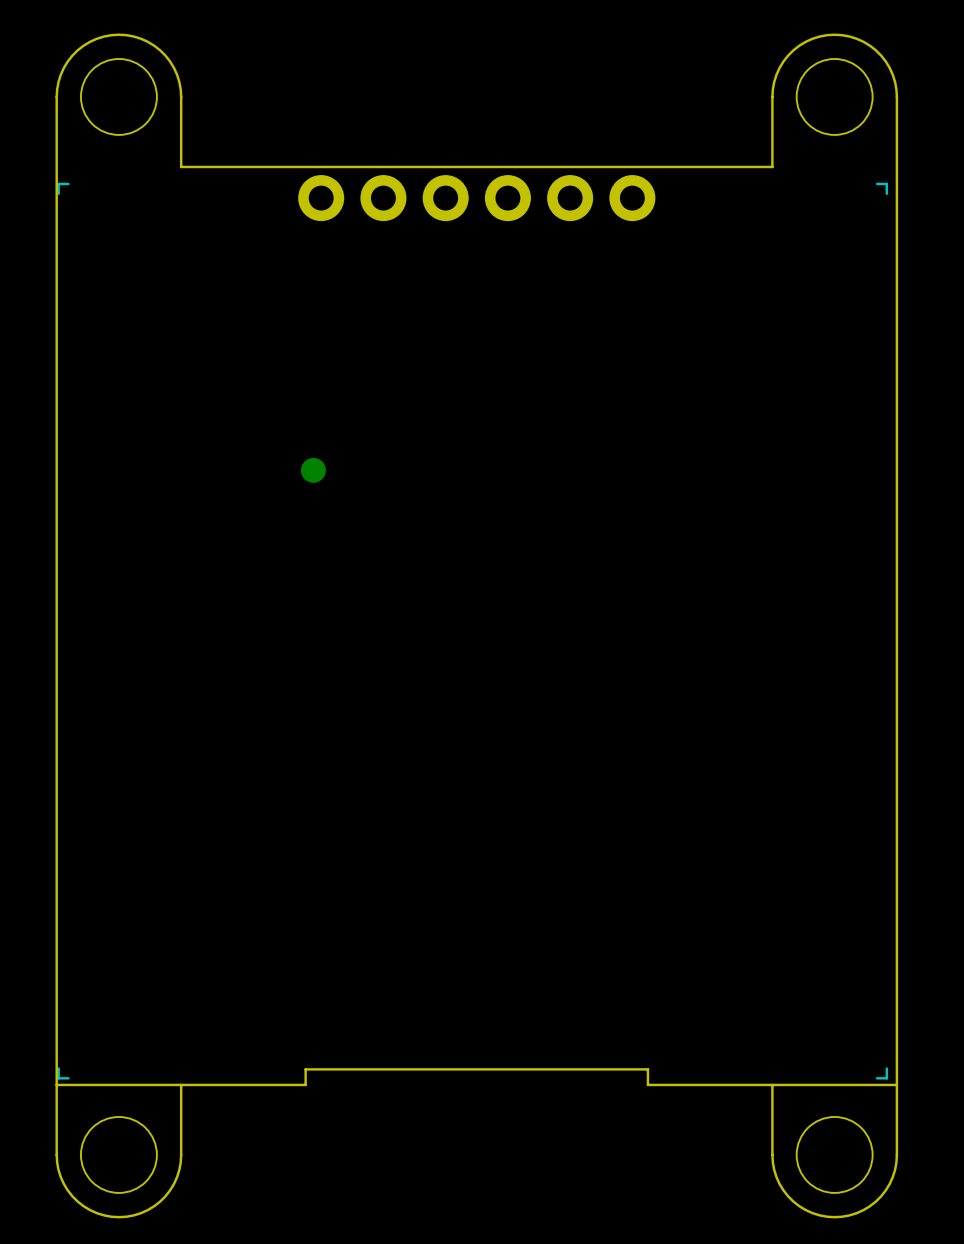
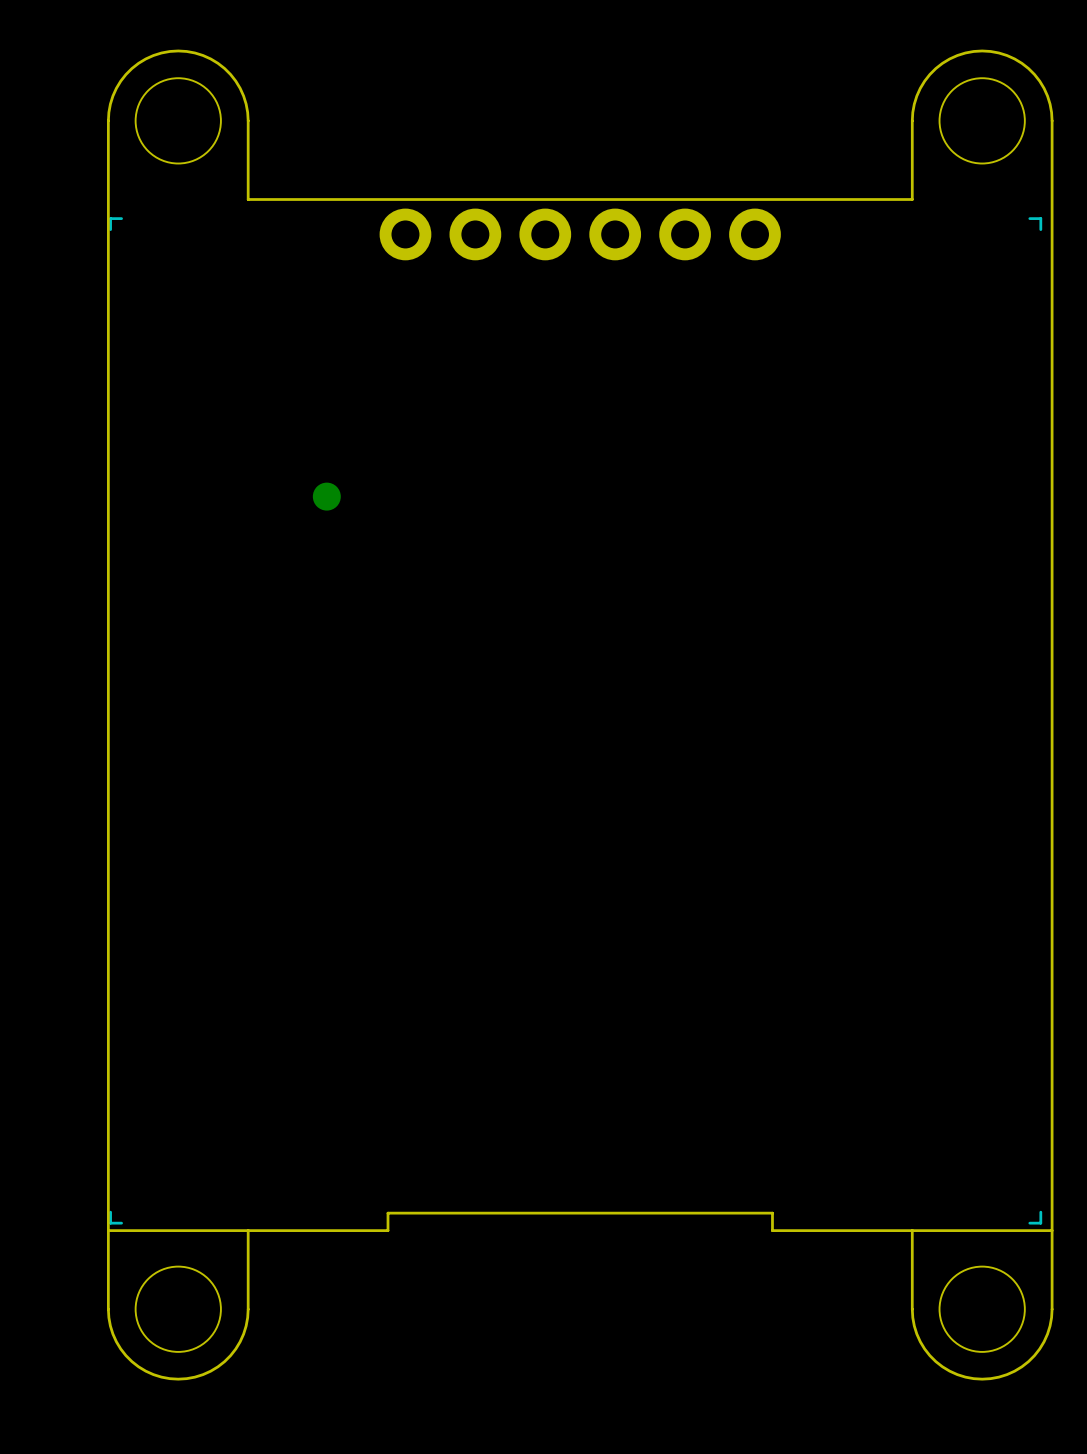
part position: (313, 470) -> (326, 496)

